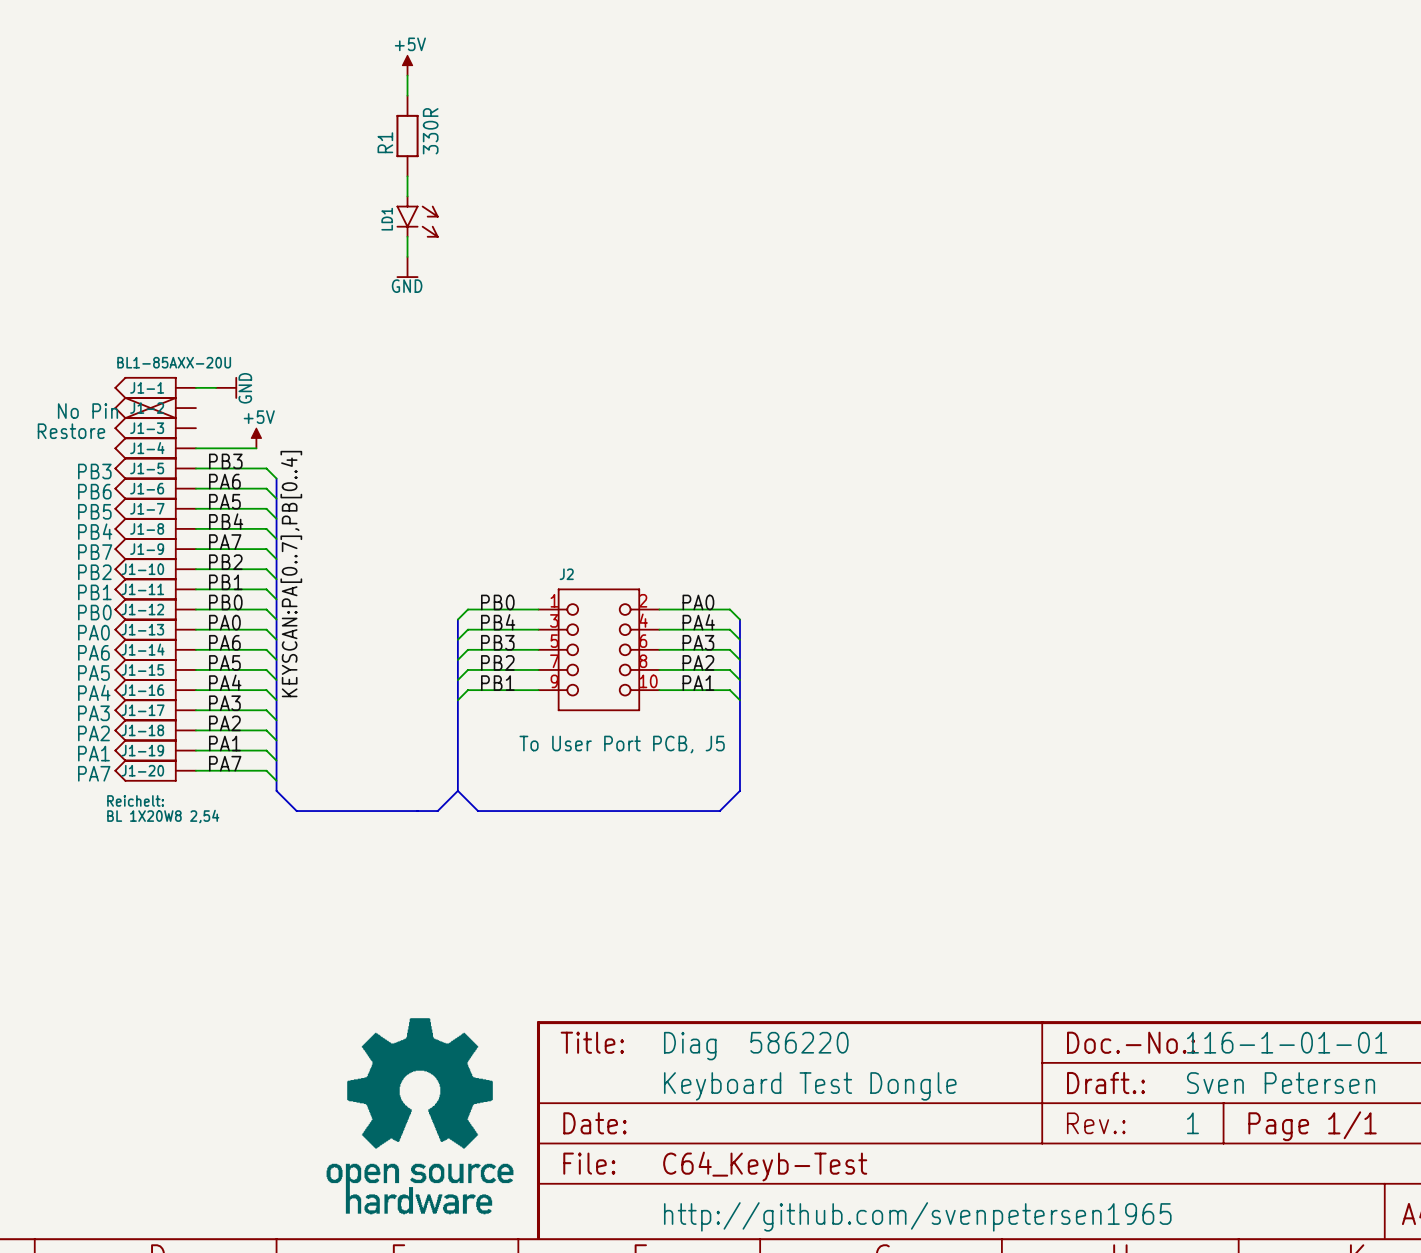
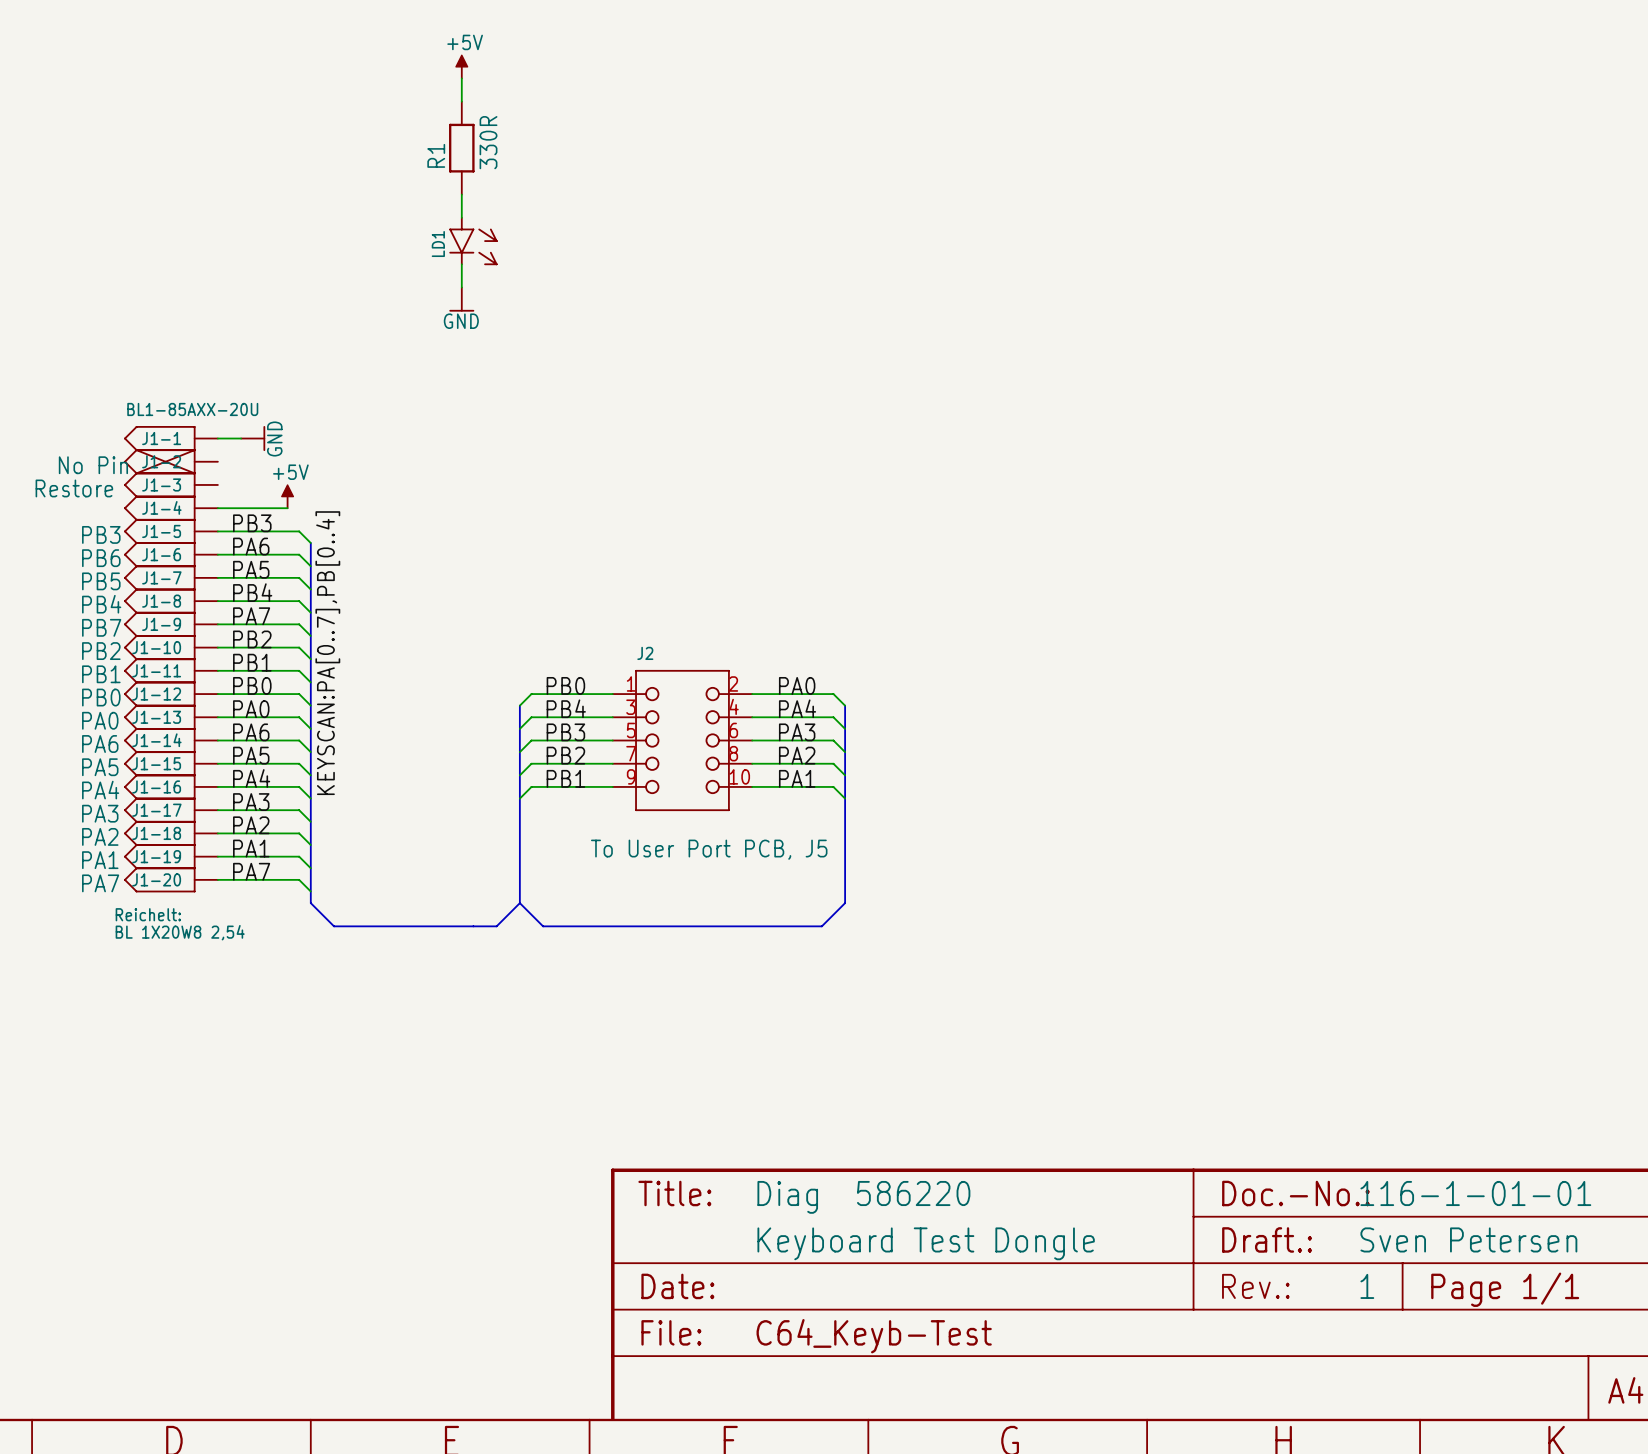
part: (420, 1116) -> none
text: http://github.com/svenpetersen1965 (917, 1216) -> none

